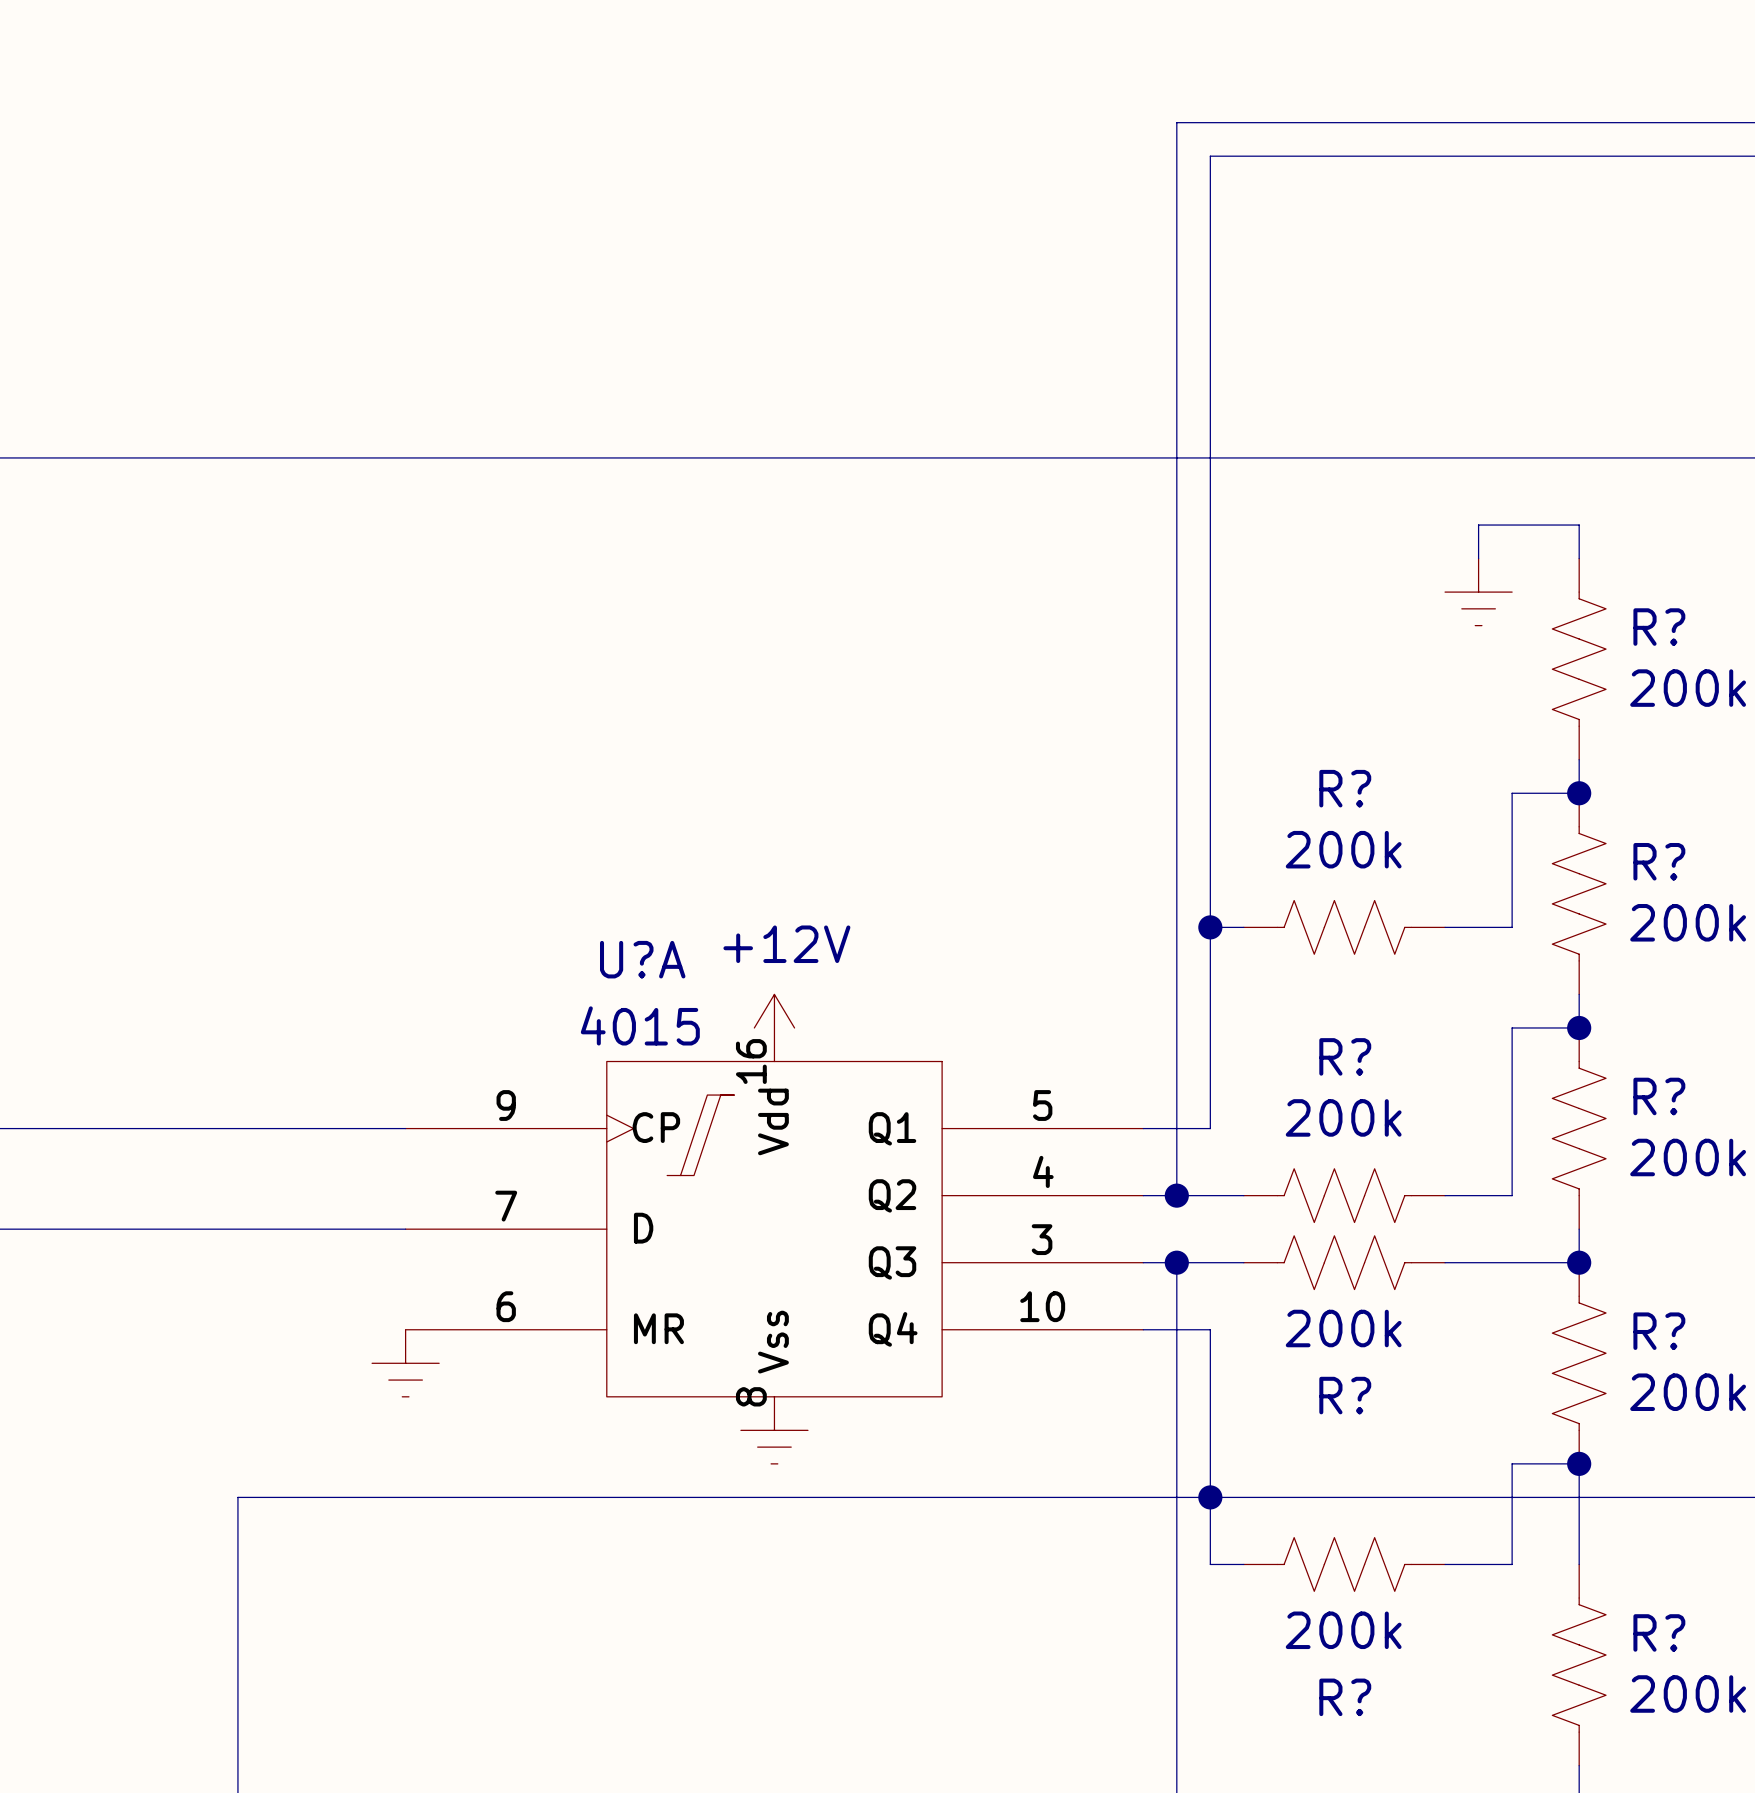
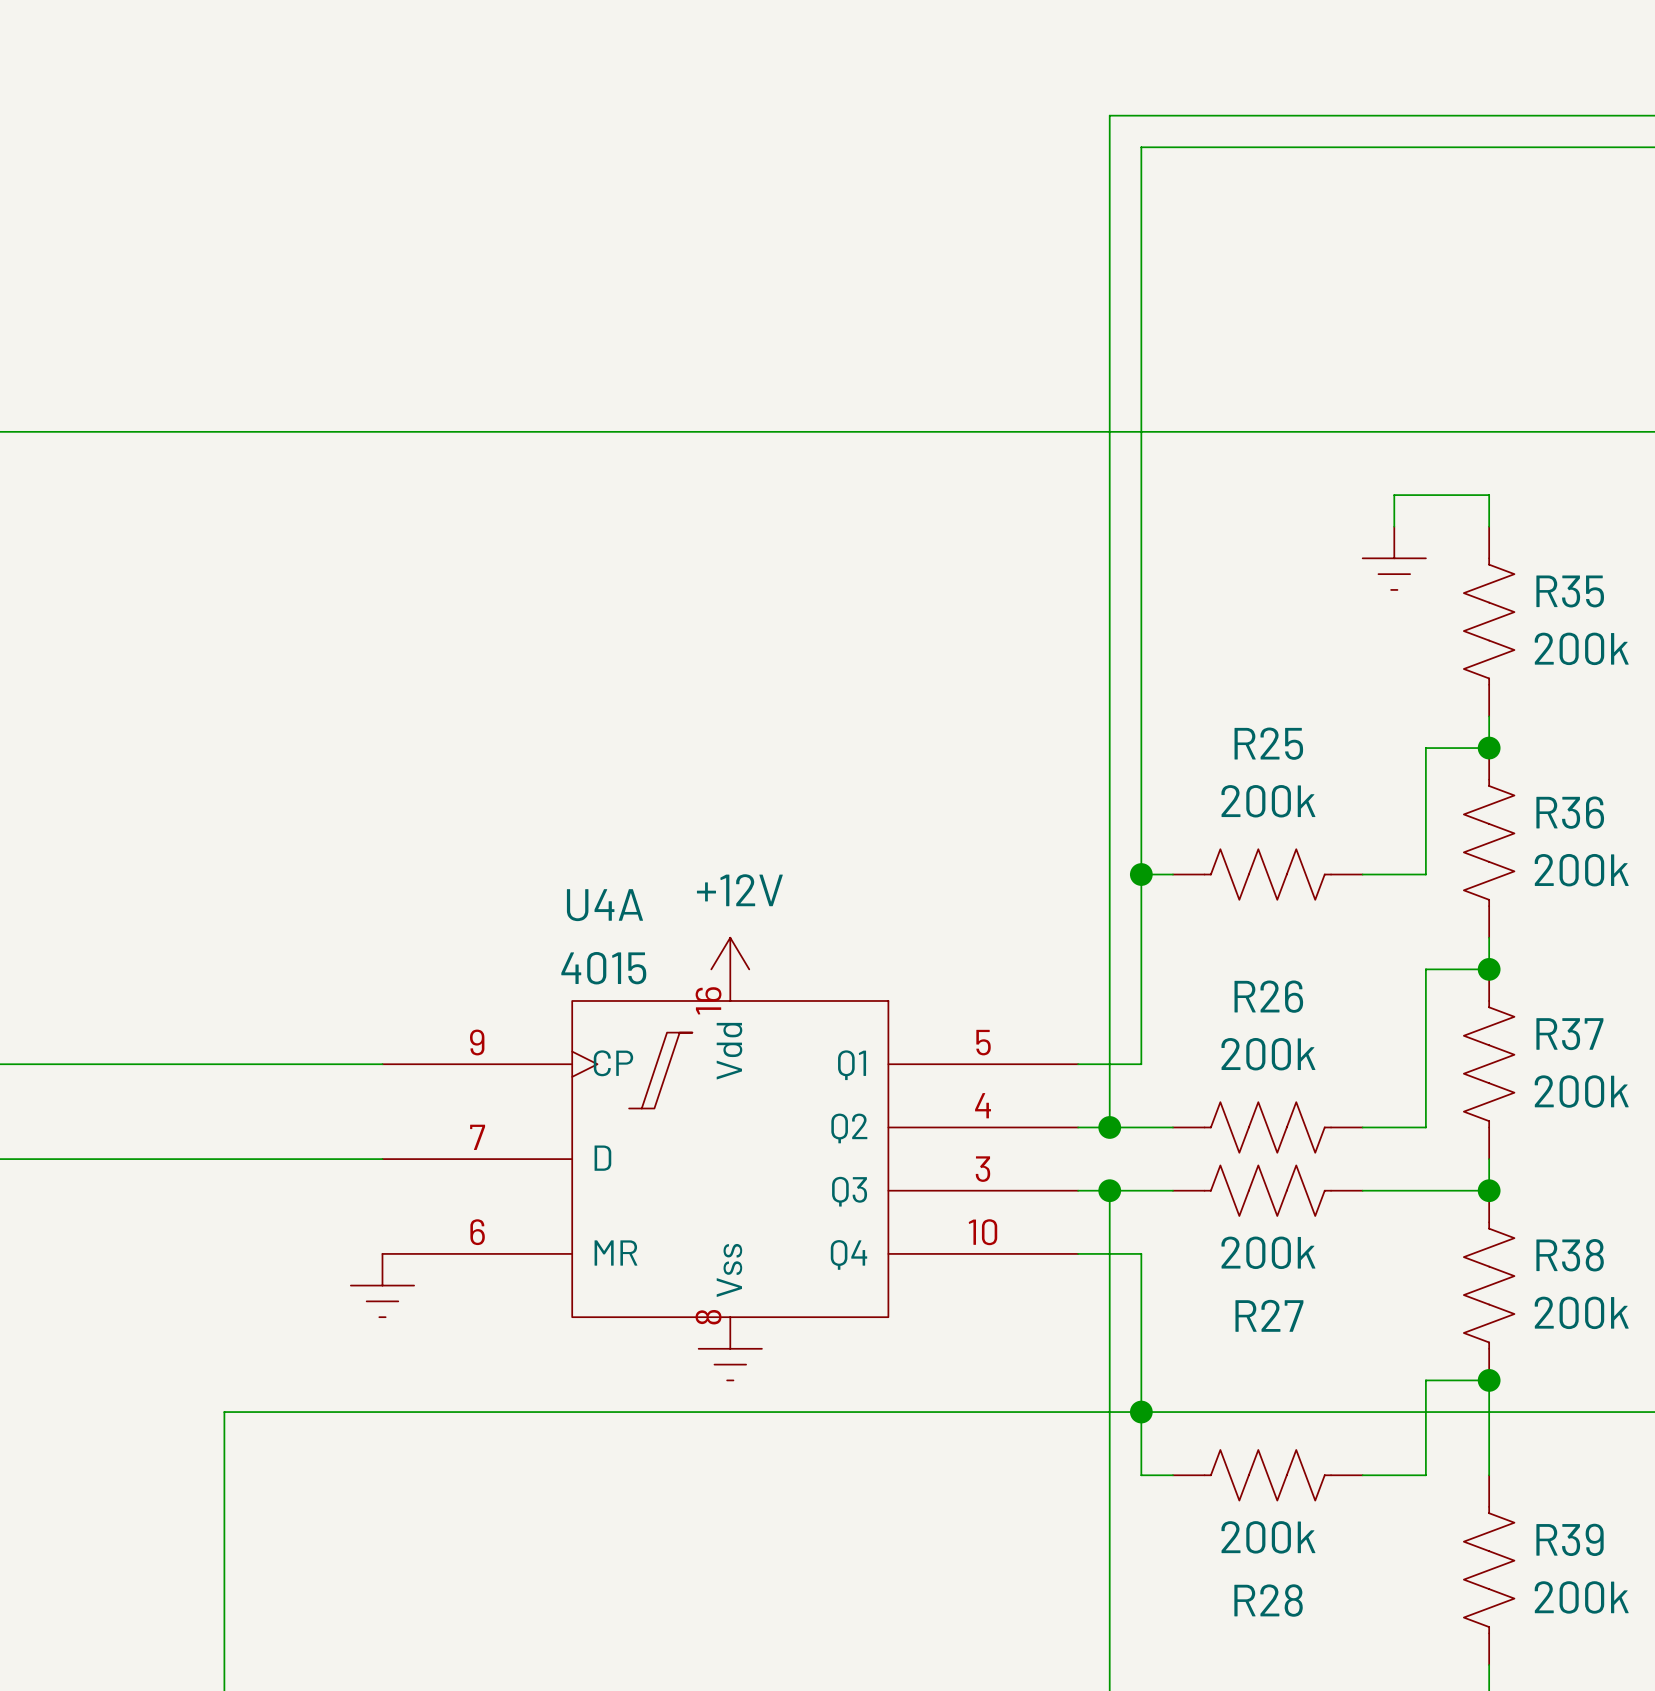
R? name: R? (1659, 627) -> R35 (1570, 591)
R? name: R? (1345, 788) -> R25 (1268, 743)
R? name: R? (1659, 861) -> R36 (1570, 812)
U?A name: U?A (642, 959) -> U4A (604, 905)
R? name: R? (1345, 1056) -> R26 (1268, 996)
R? name: R? (1659, 1096) -> R37 (1569, 1034)
R? name: R? (1659, 1331) -> R38 (1570, 1255)
R? name: R? (1345, 1395) -> R27 (1269, 1315)
R? name: R? (1659, 1632) -> R39 (1570, 1539)
R? name: R? (1345, 1697) -> R28 (1268, 1600)

